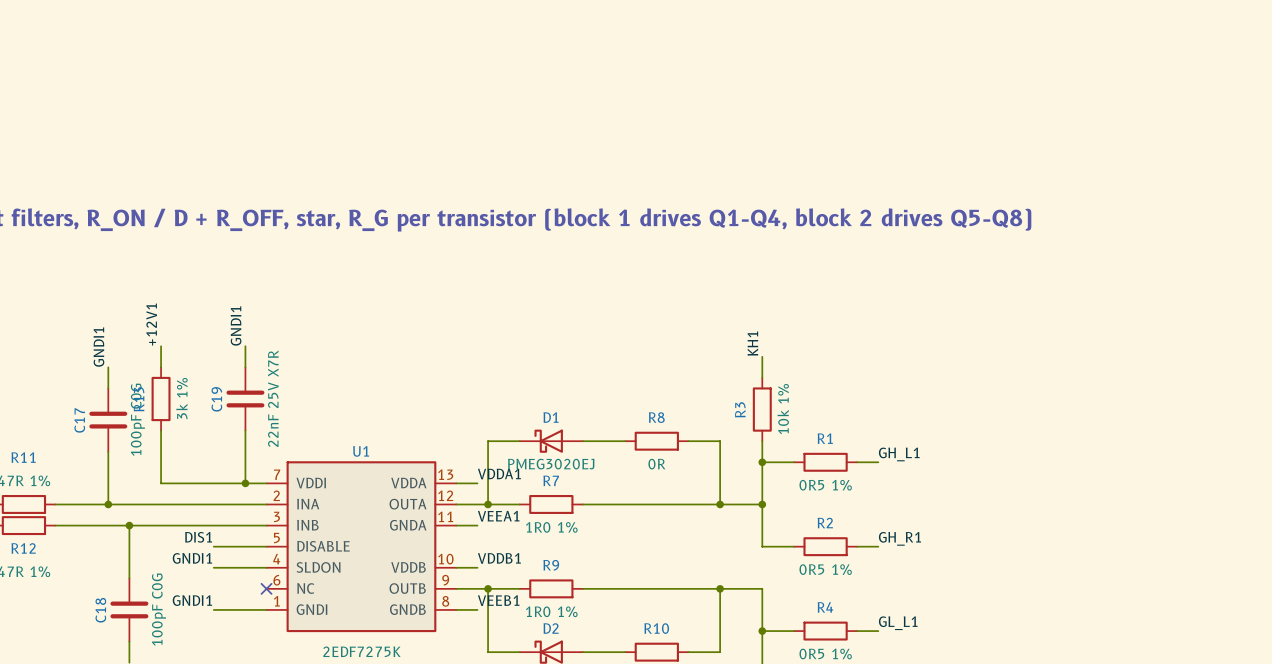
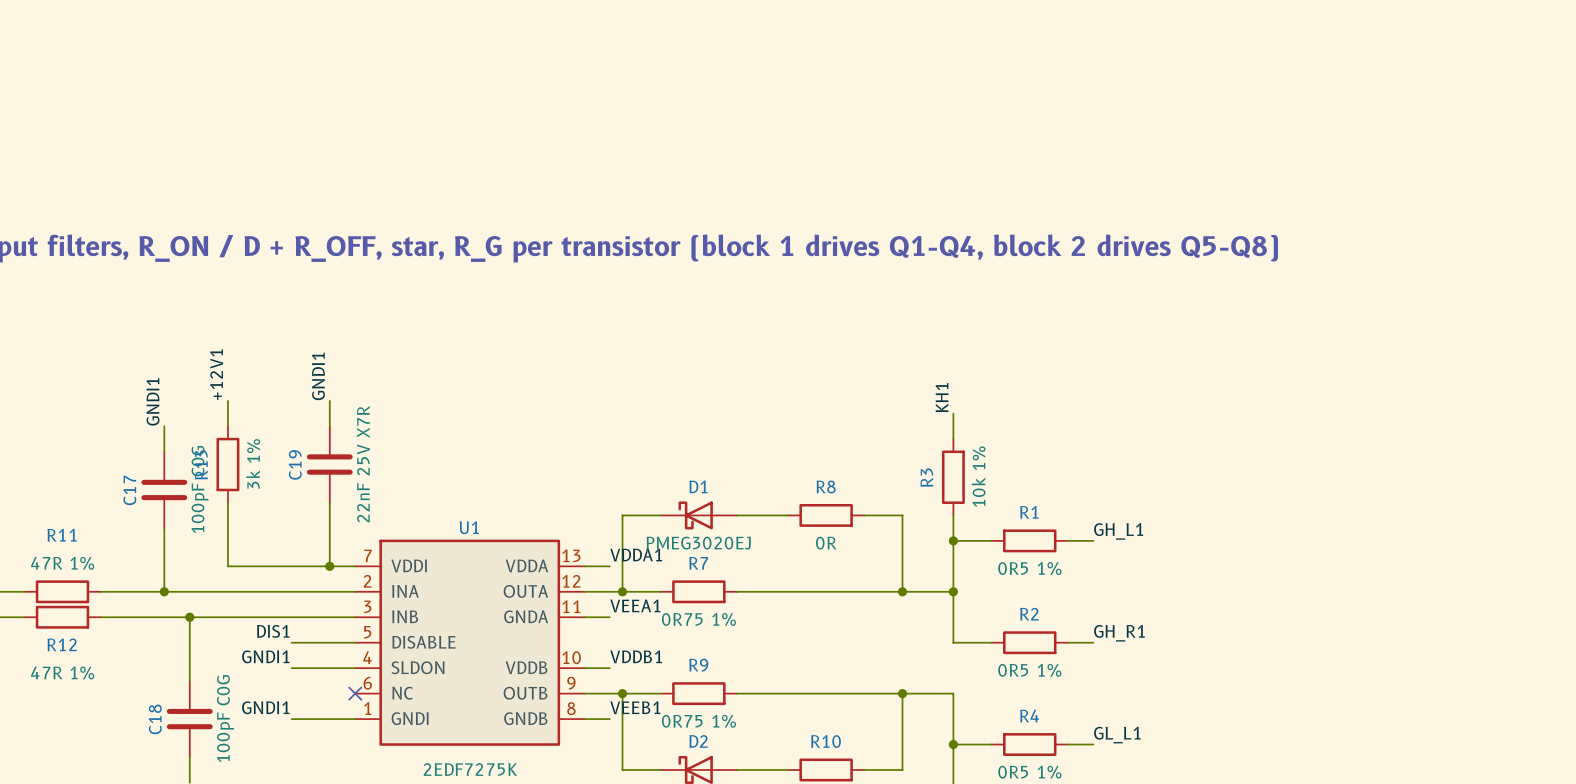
R7 value: 1R0 1% (551, 527) -> 0R75 1% (698, 619)
R9 value: 1R0 1% (551, 611) -> 0R75 1% (698, 721)

